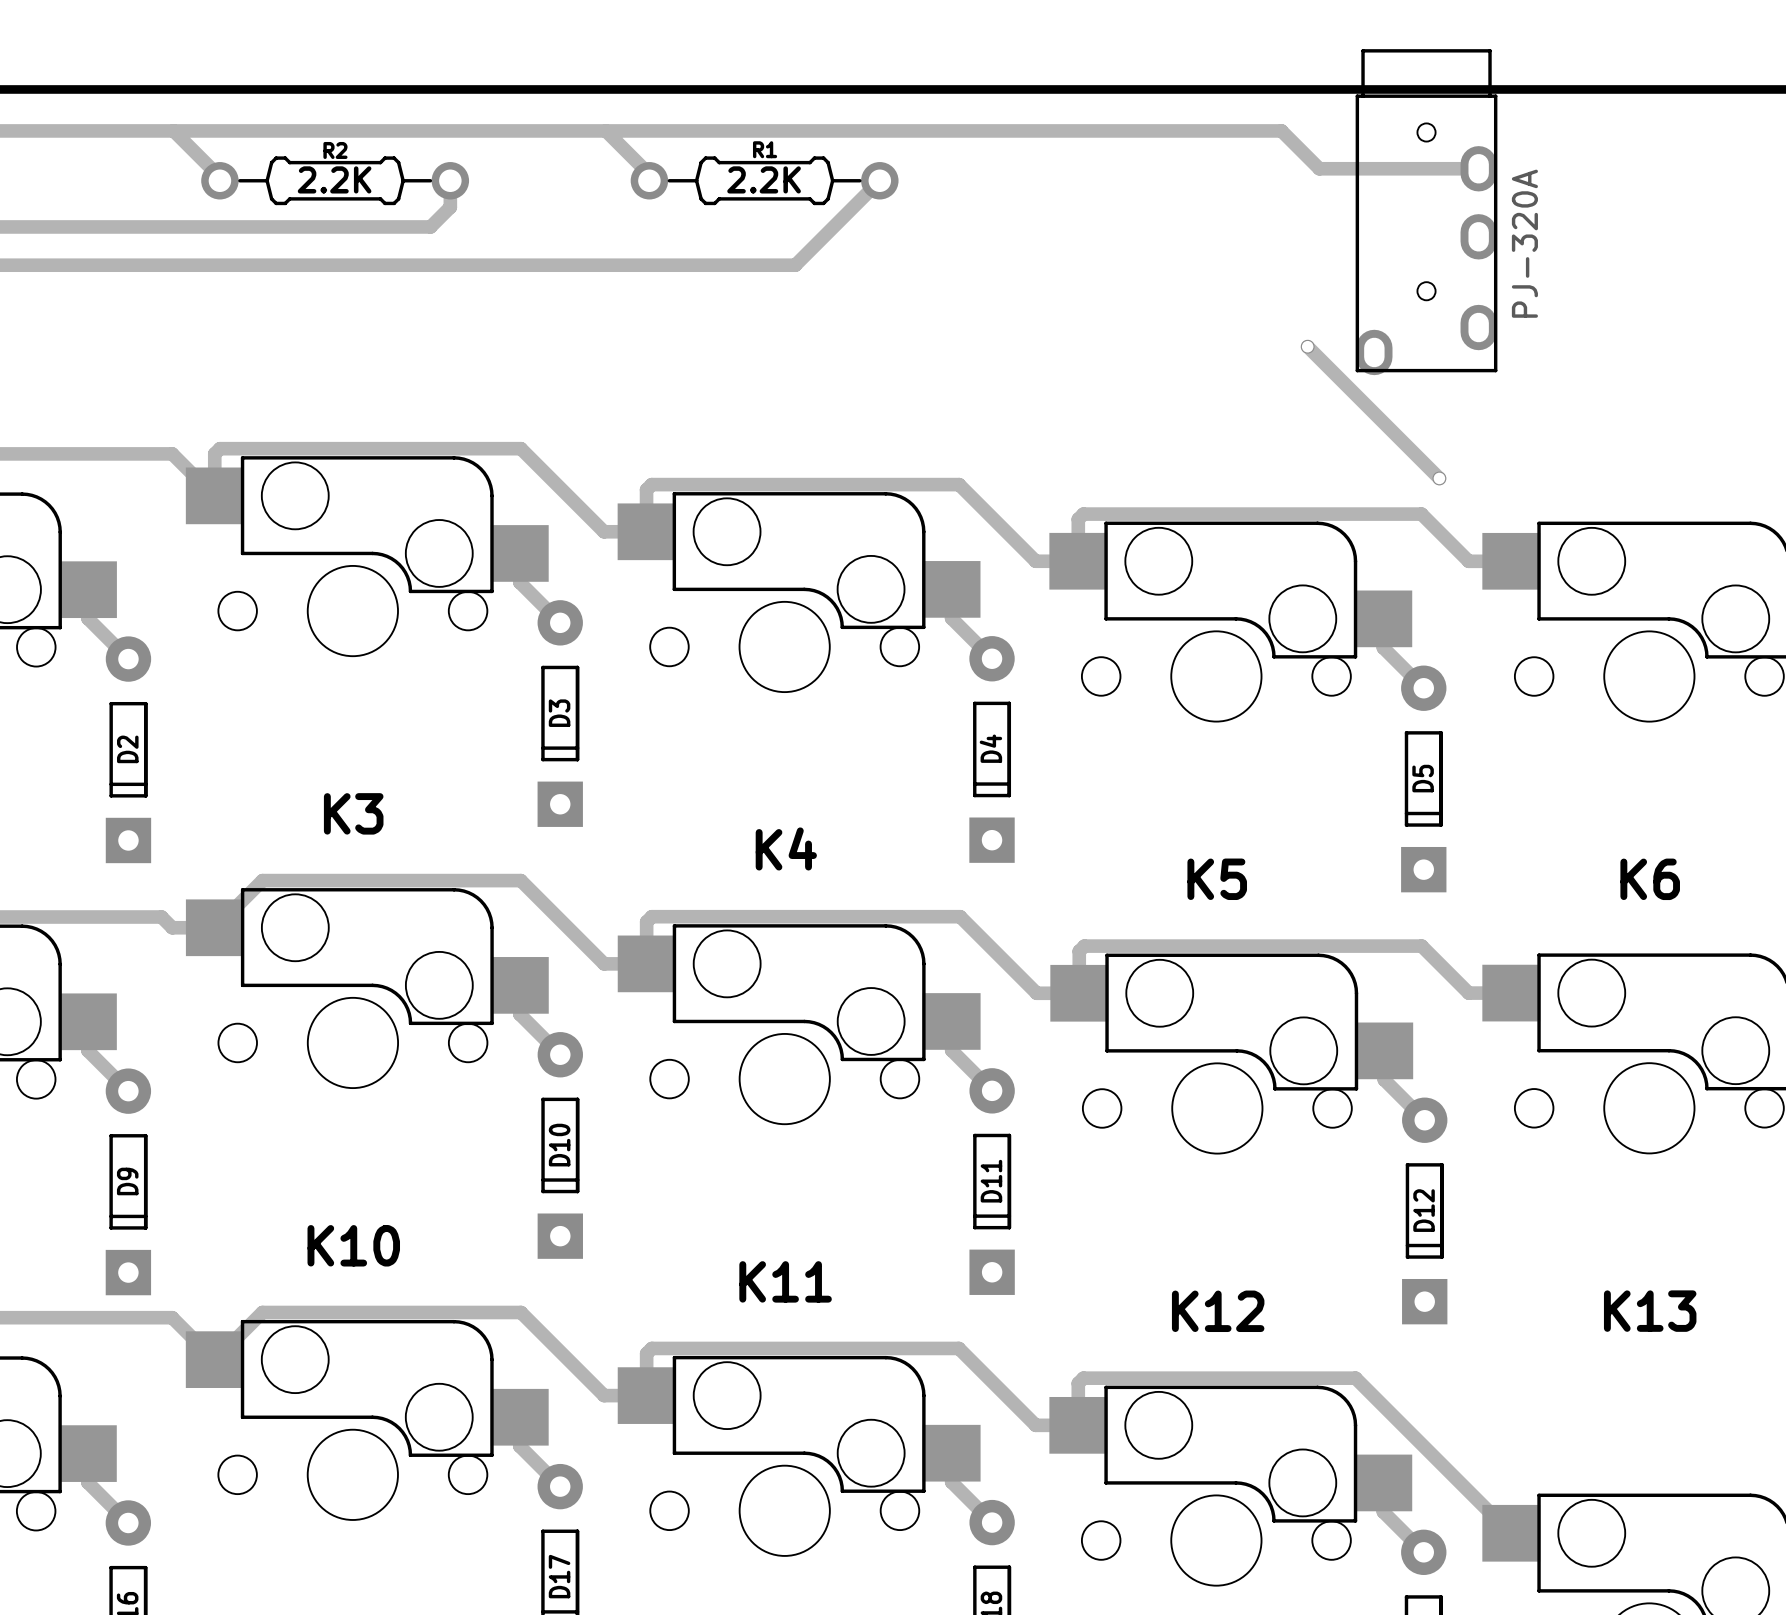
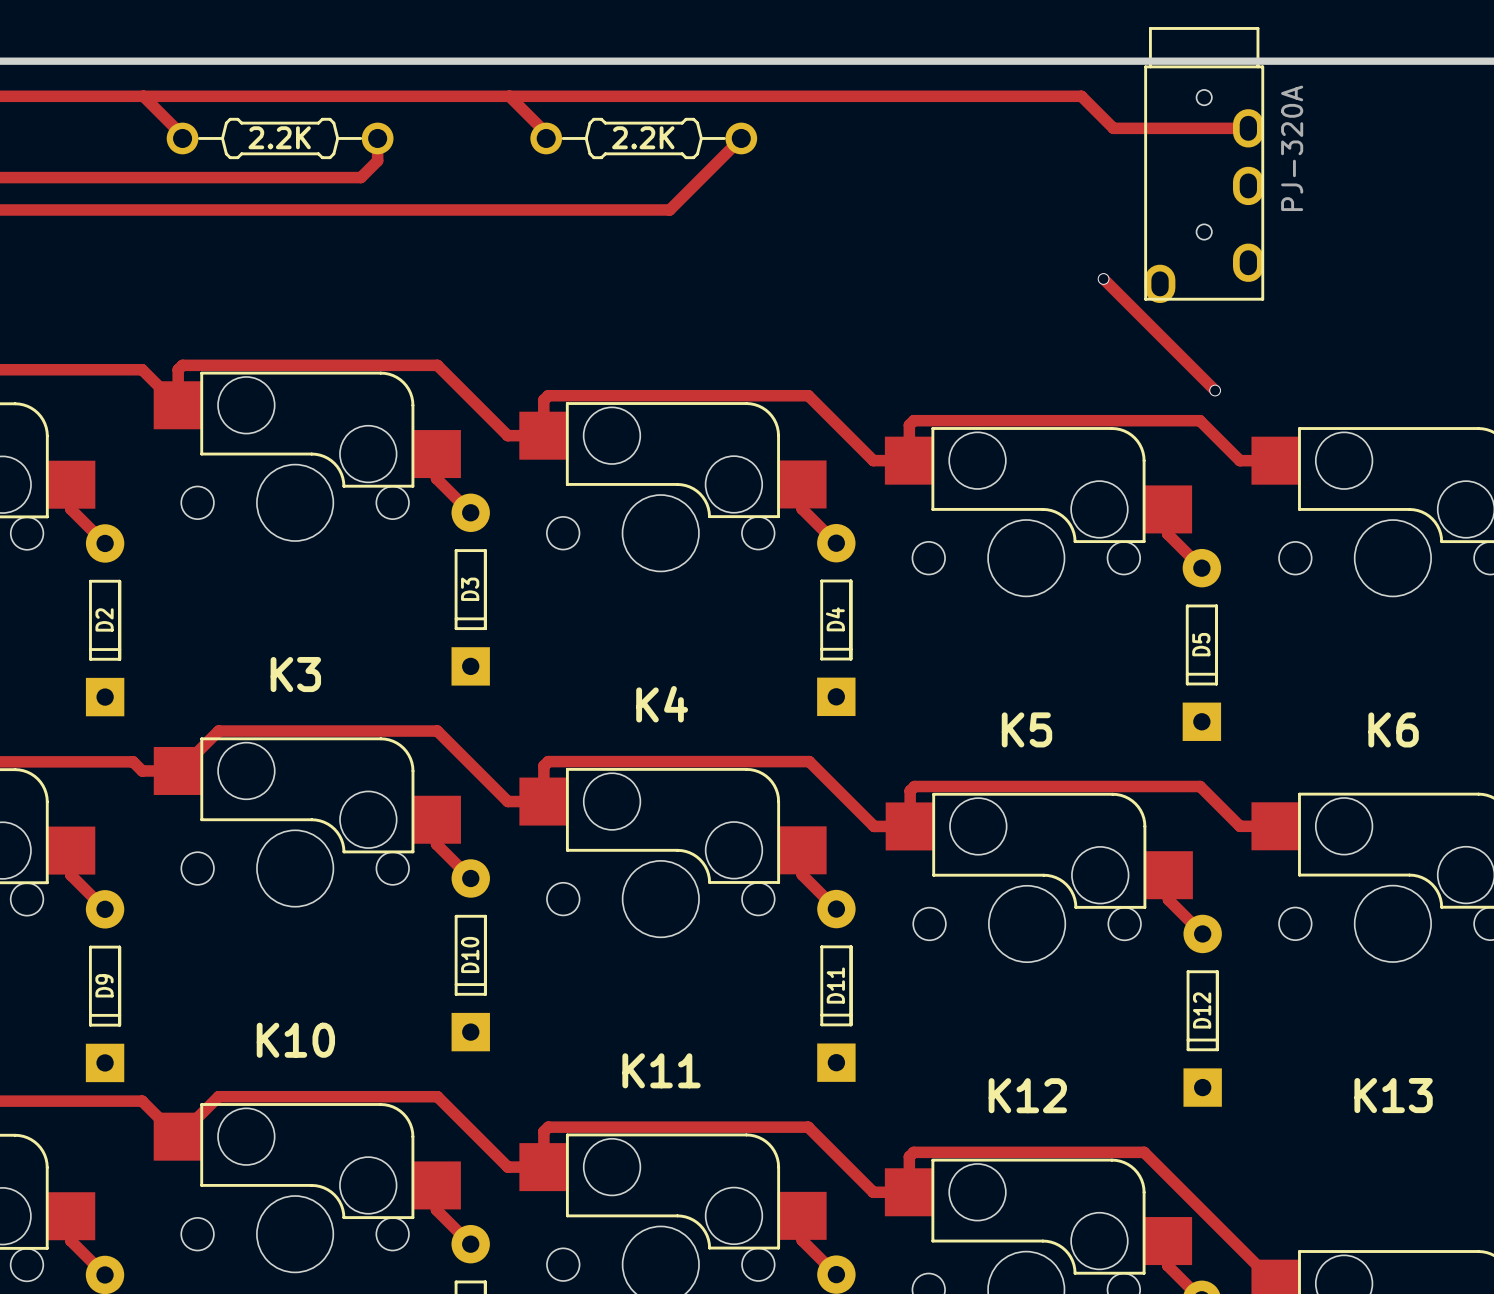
R1 name: R1 (765, 149) -> none
R2 name: R2 (335, 150) -> none
part value position: PJ-320A (1524, 243) -> PJ-320A (1292, 148)

